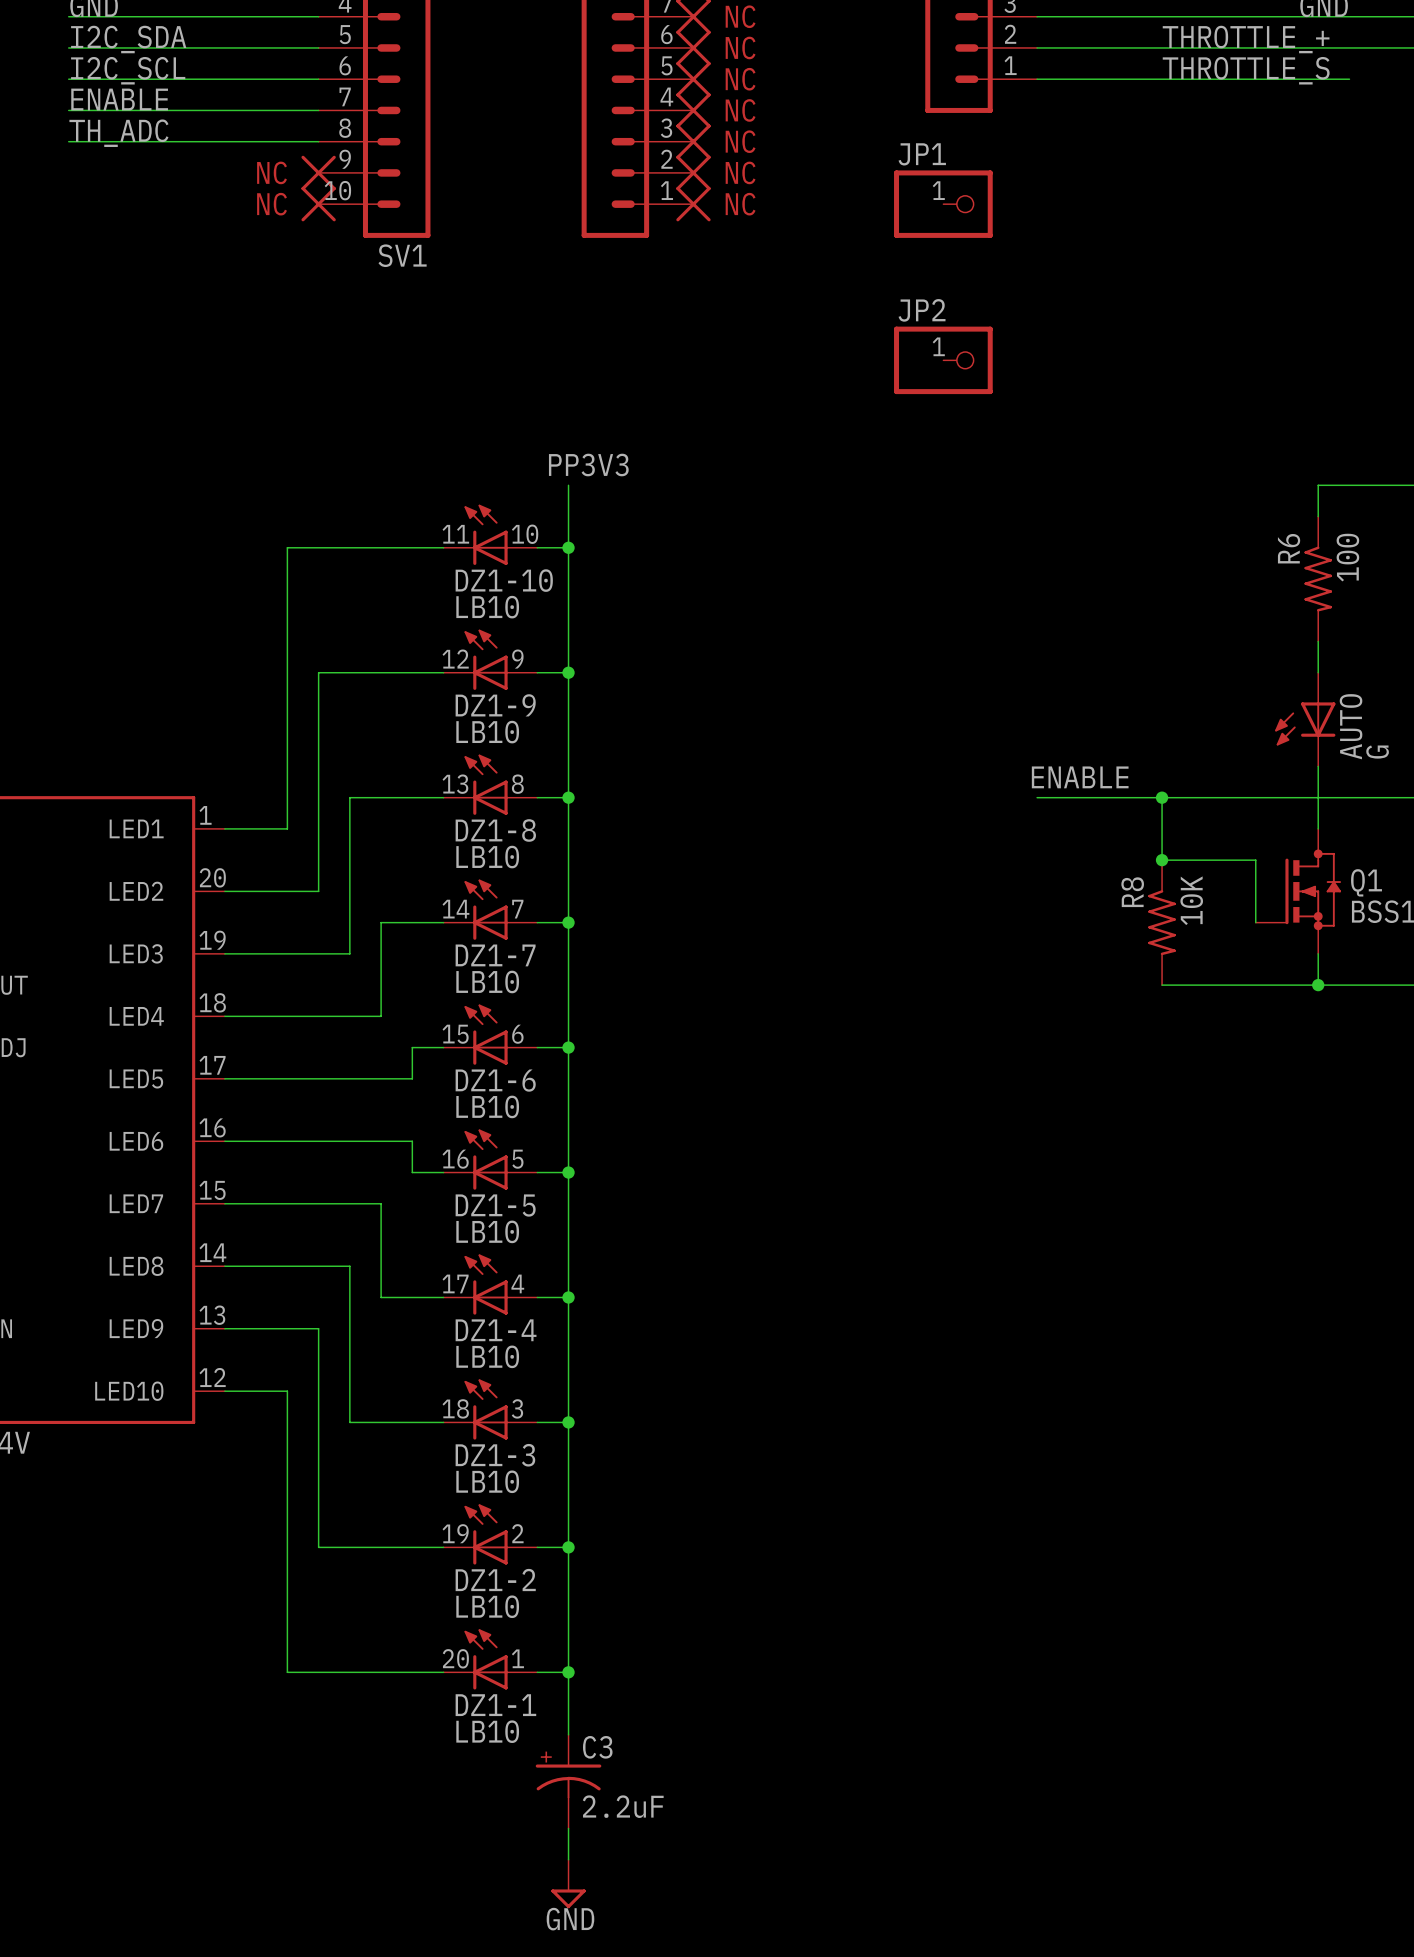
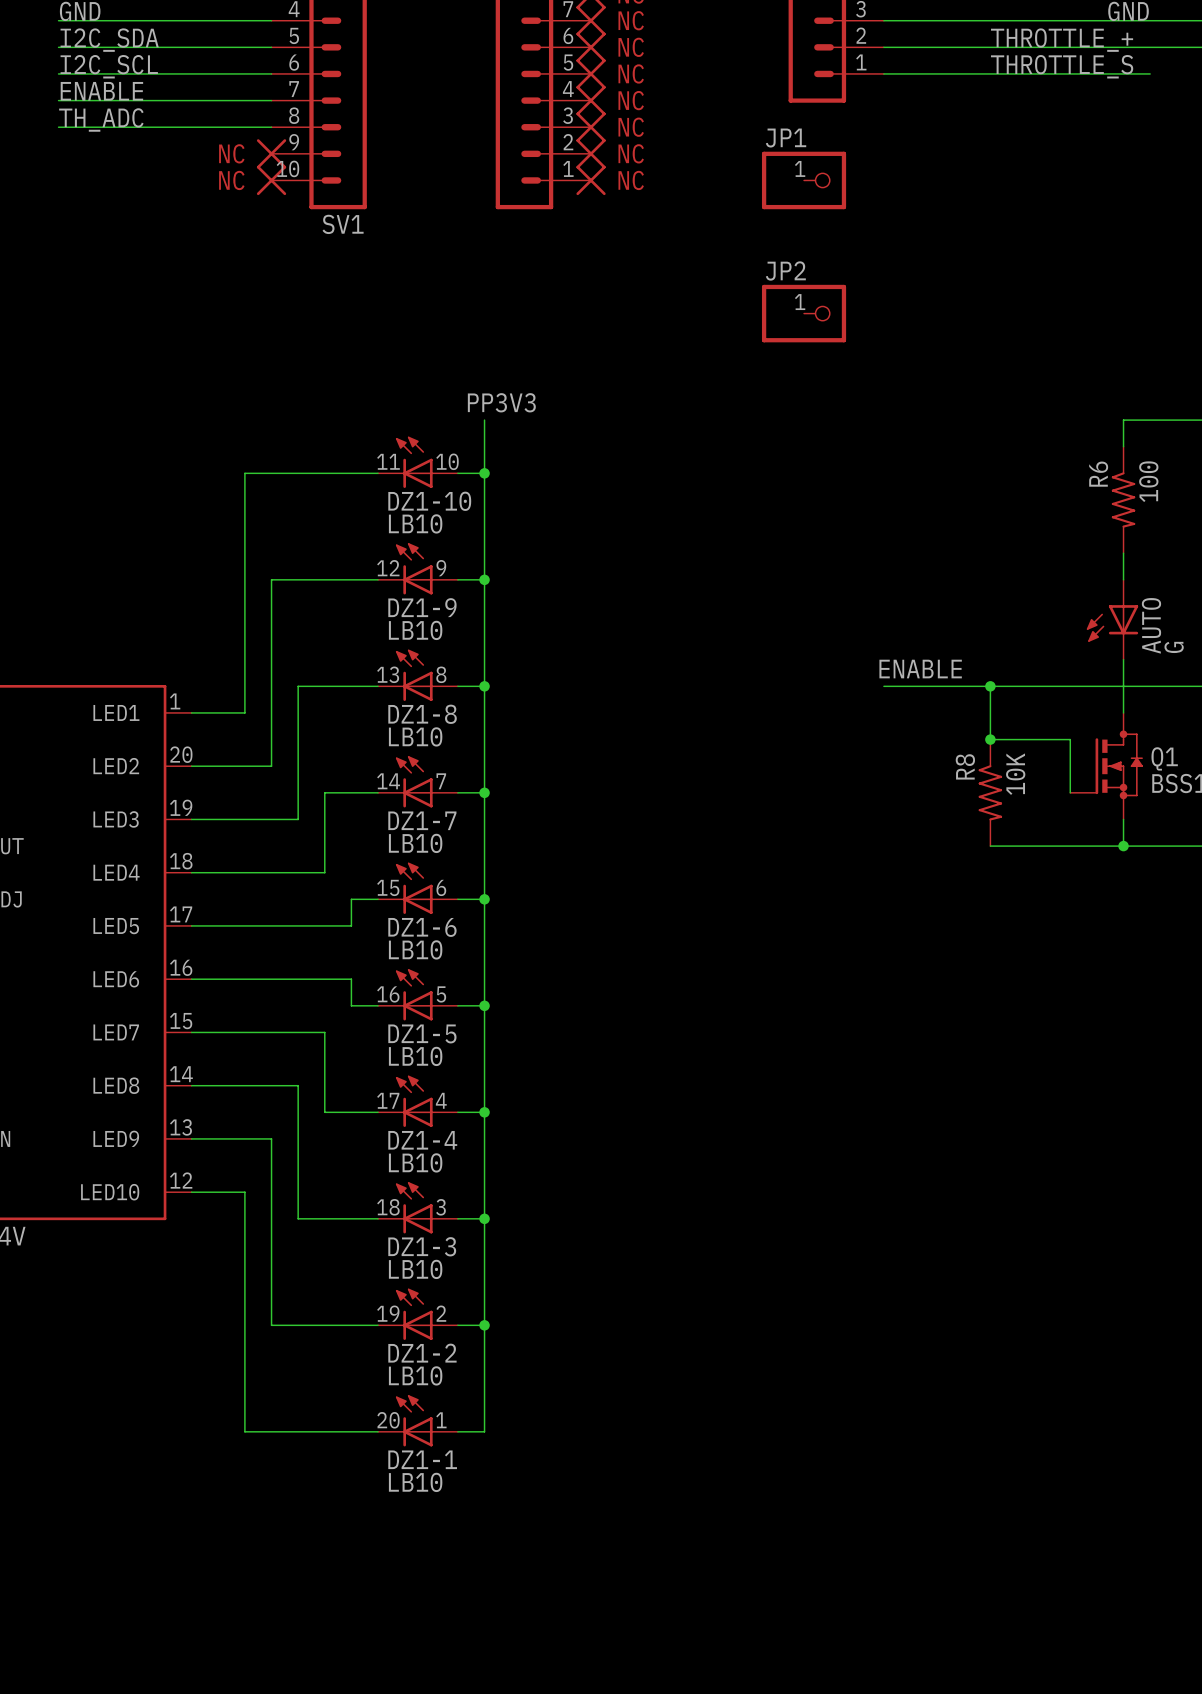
wire: (568, 1672) (568, 1734) -> none
junction: (568, 1672) -> none
C3: 2.2uF (568, 1781) -> none
wire: (568, 1828) (568, 1859) -> none
power symbol: GND (568, 1883) -> none

